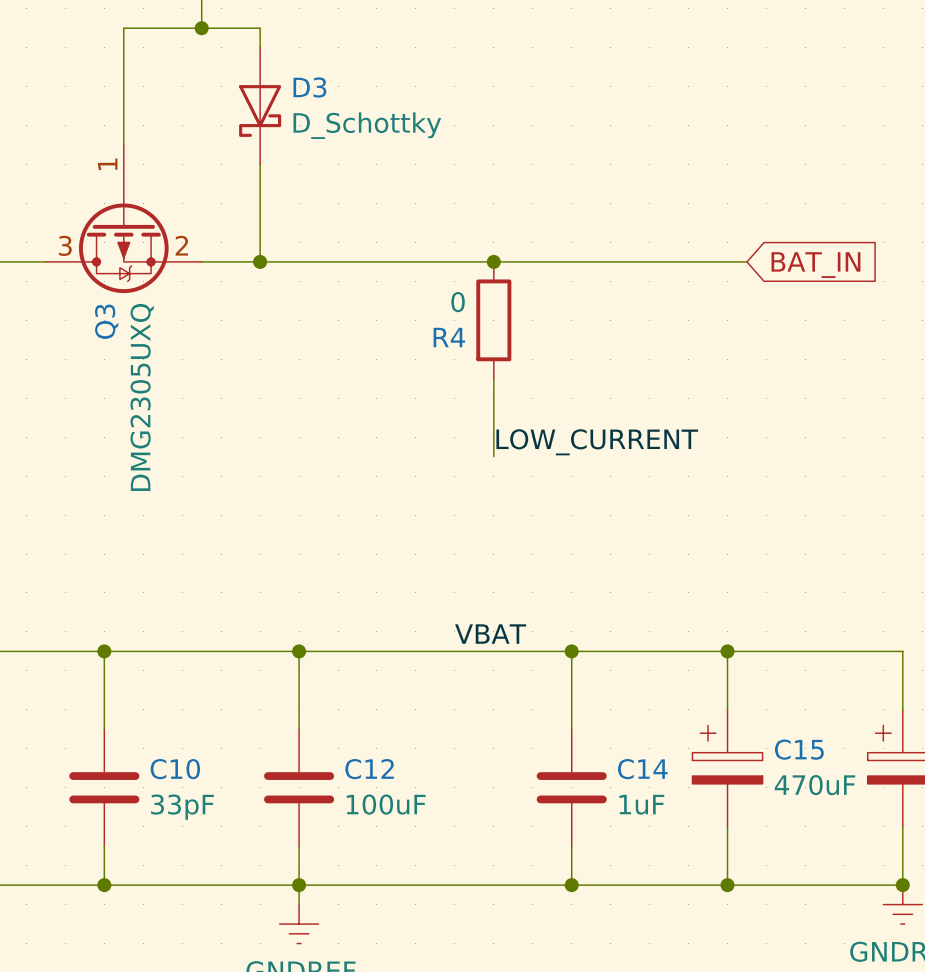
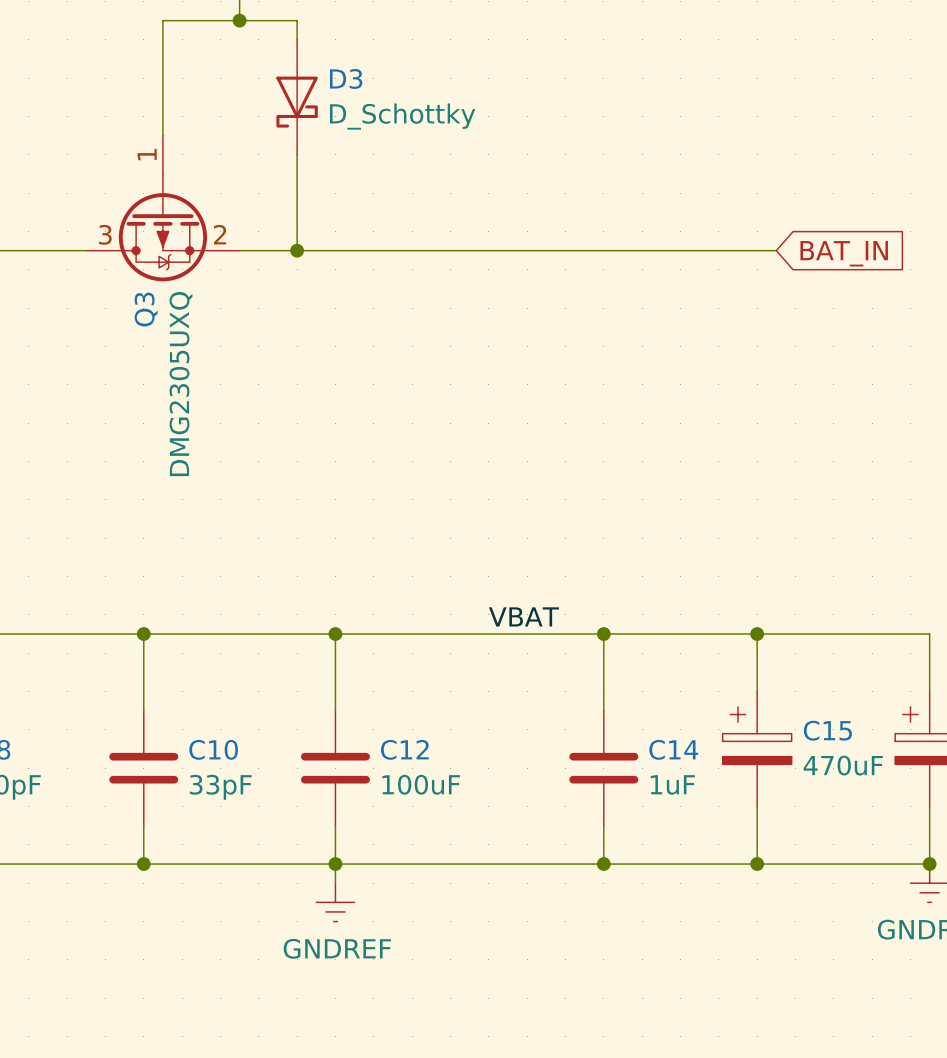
junction: (493, 261) -> none
R4: 0 (493, 320) -> none
wire: (493, 378) (493, 456) -> none
label: LOW_CURRENT (597, 442) -> none

